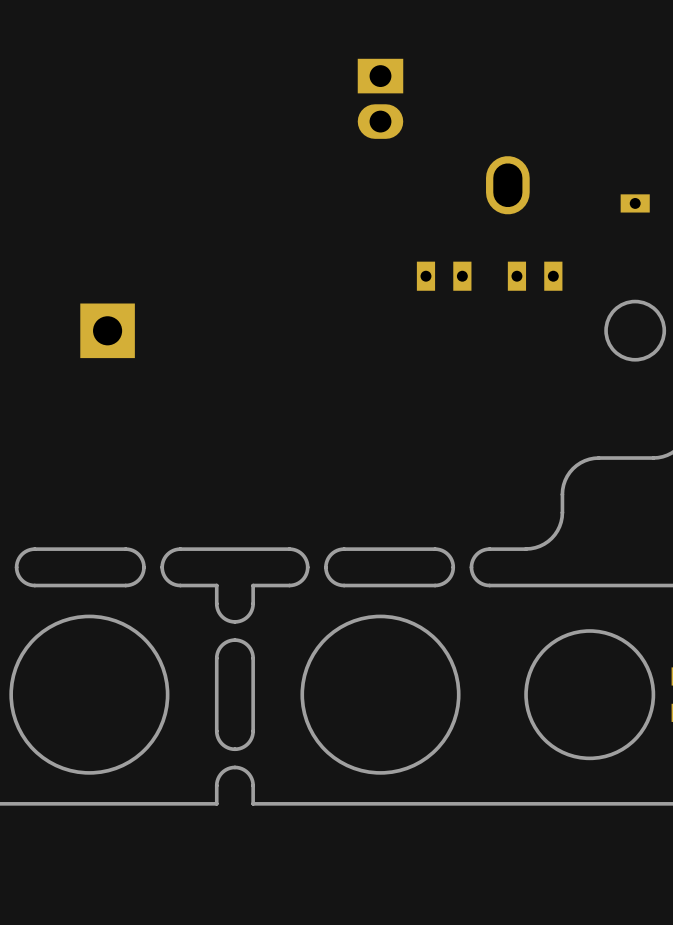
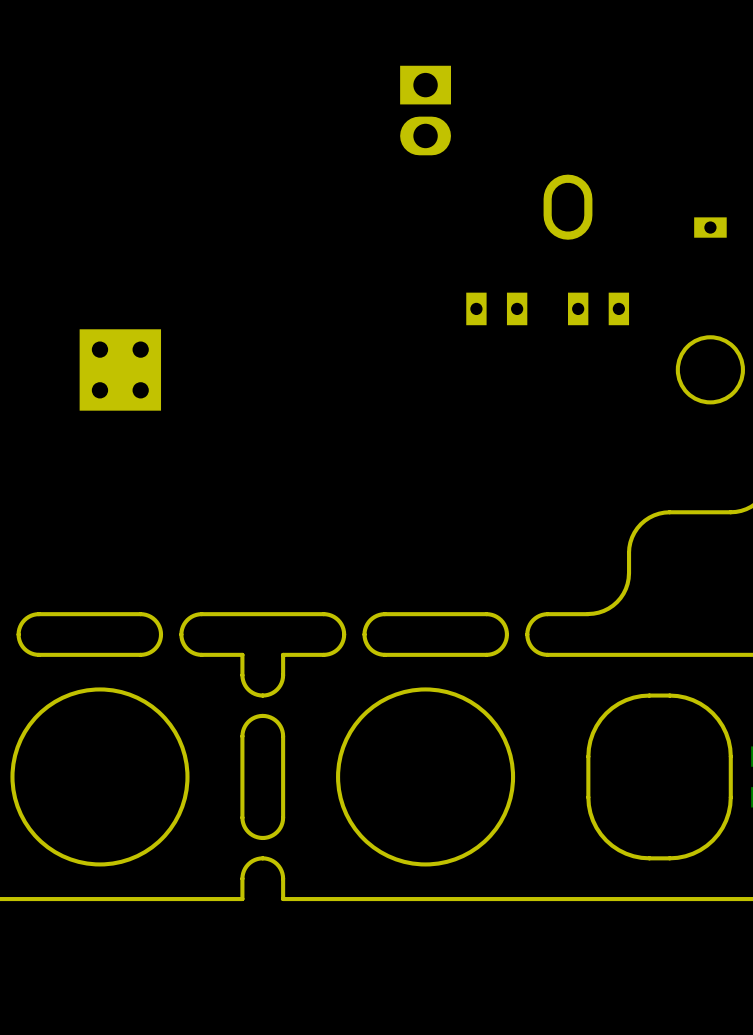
part footprint: [80, 303, 135, 359] -> [79, 329, 162, 411]
board edge: none -> (669, 695) (641, 696) (618, 703) (600, 719) (590, 740) (588, 797) (592, 820) (606, 840) (618, 850) (633, 856) (669, 858) (693, 853) (712, 840) (722, 827) (728, 813) (730, 797) (730, 748) (722, 726) (712, 713) (700, 703) (685, 697) (669, 695)
round board edge: [524, 629, 656, 761] -> none

